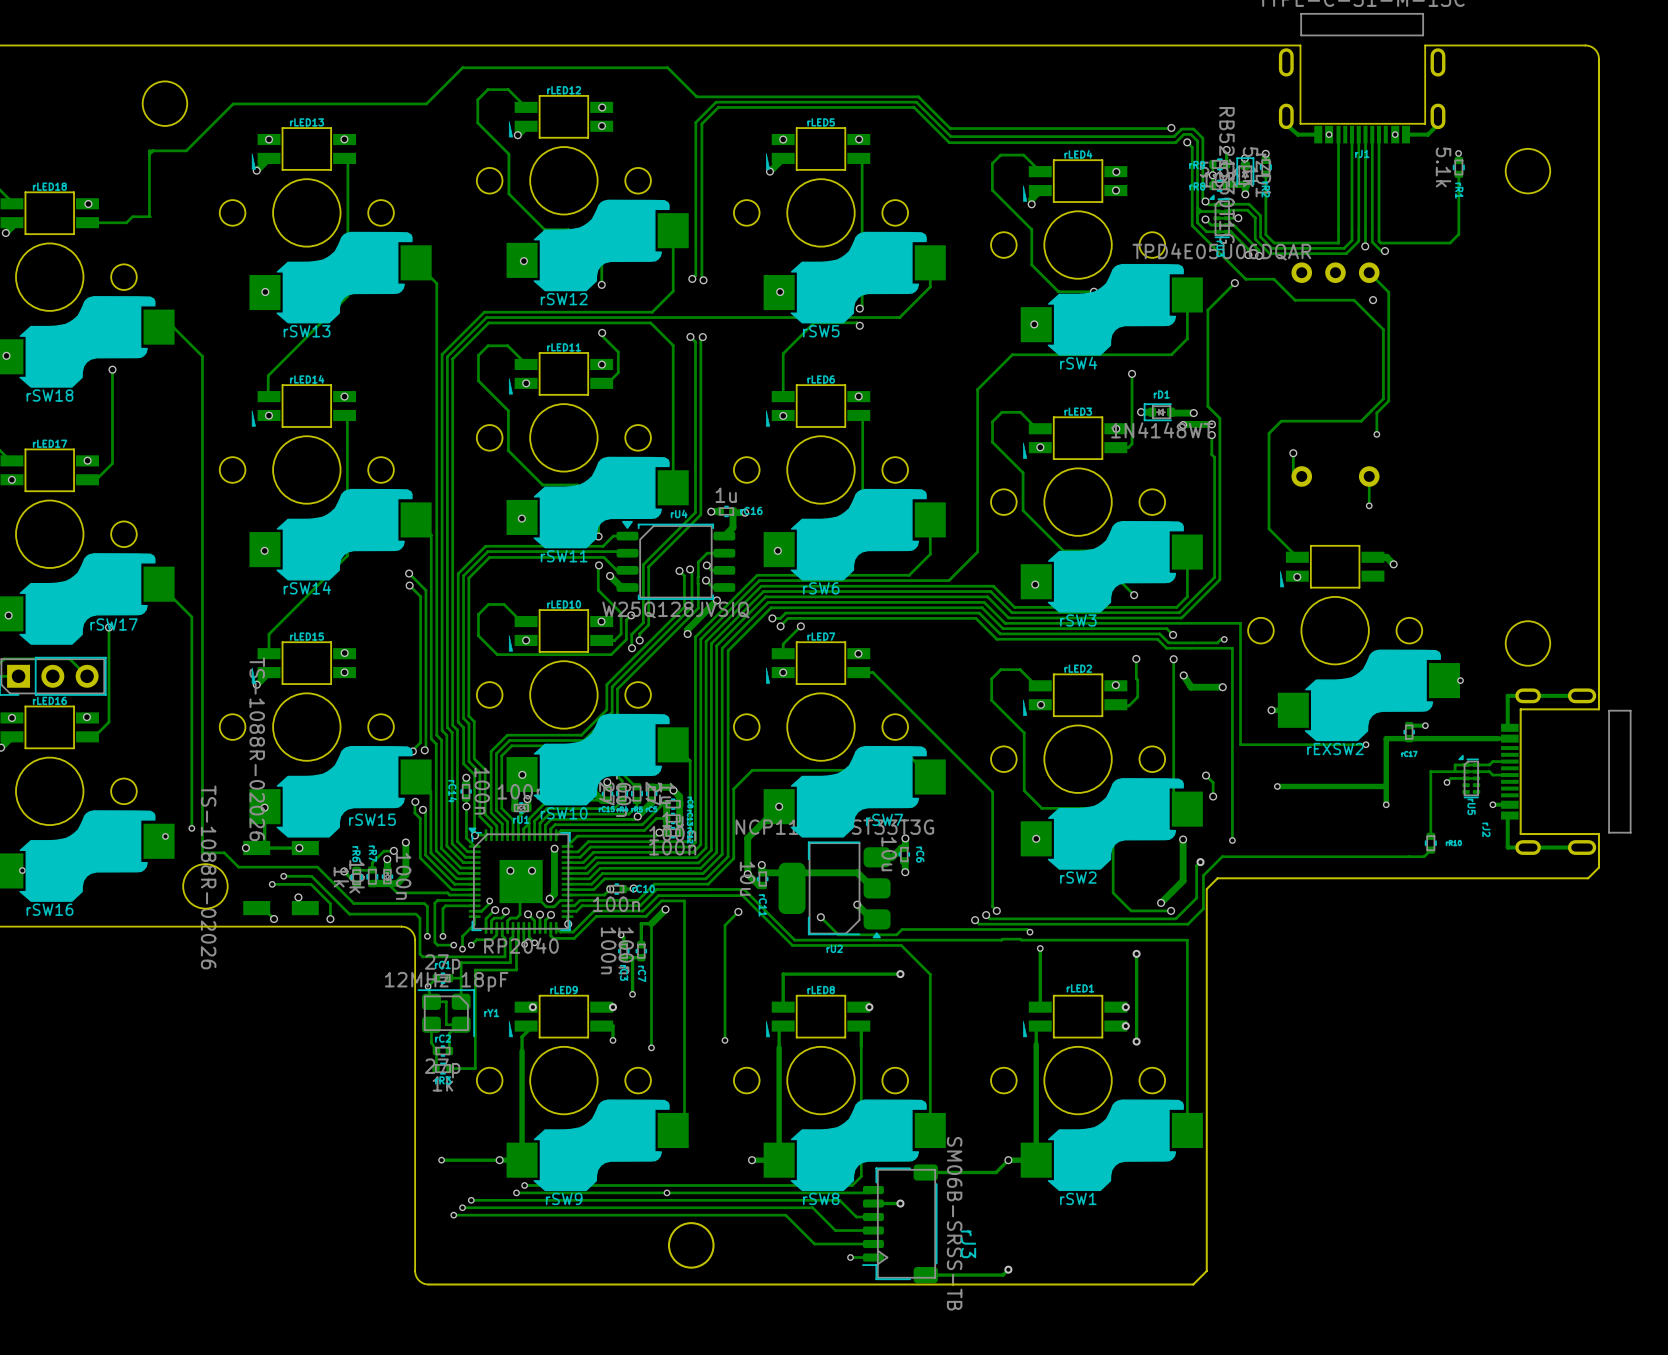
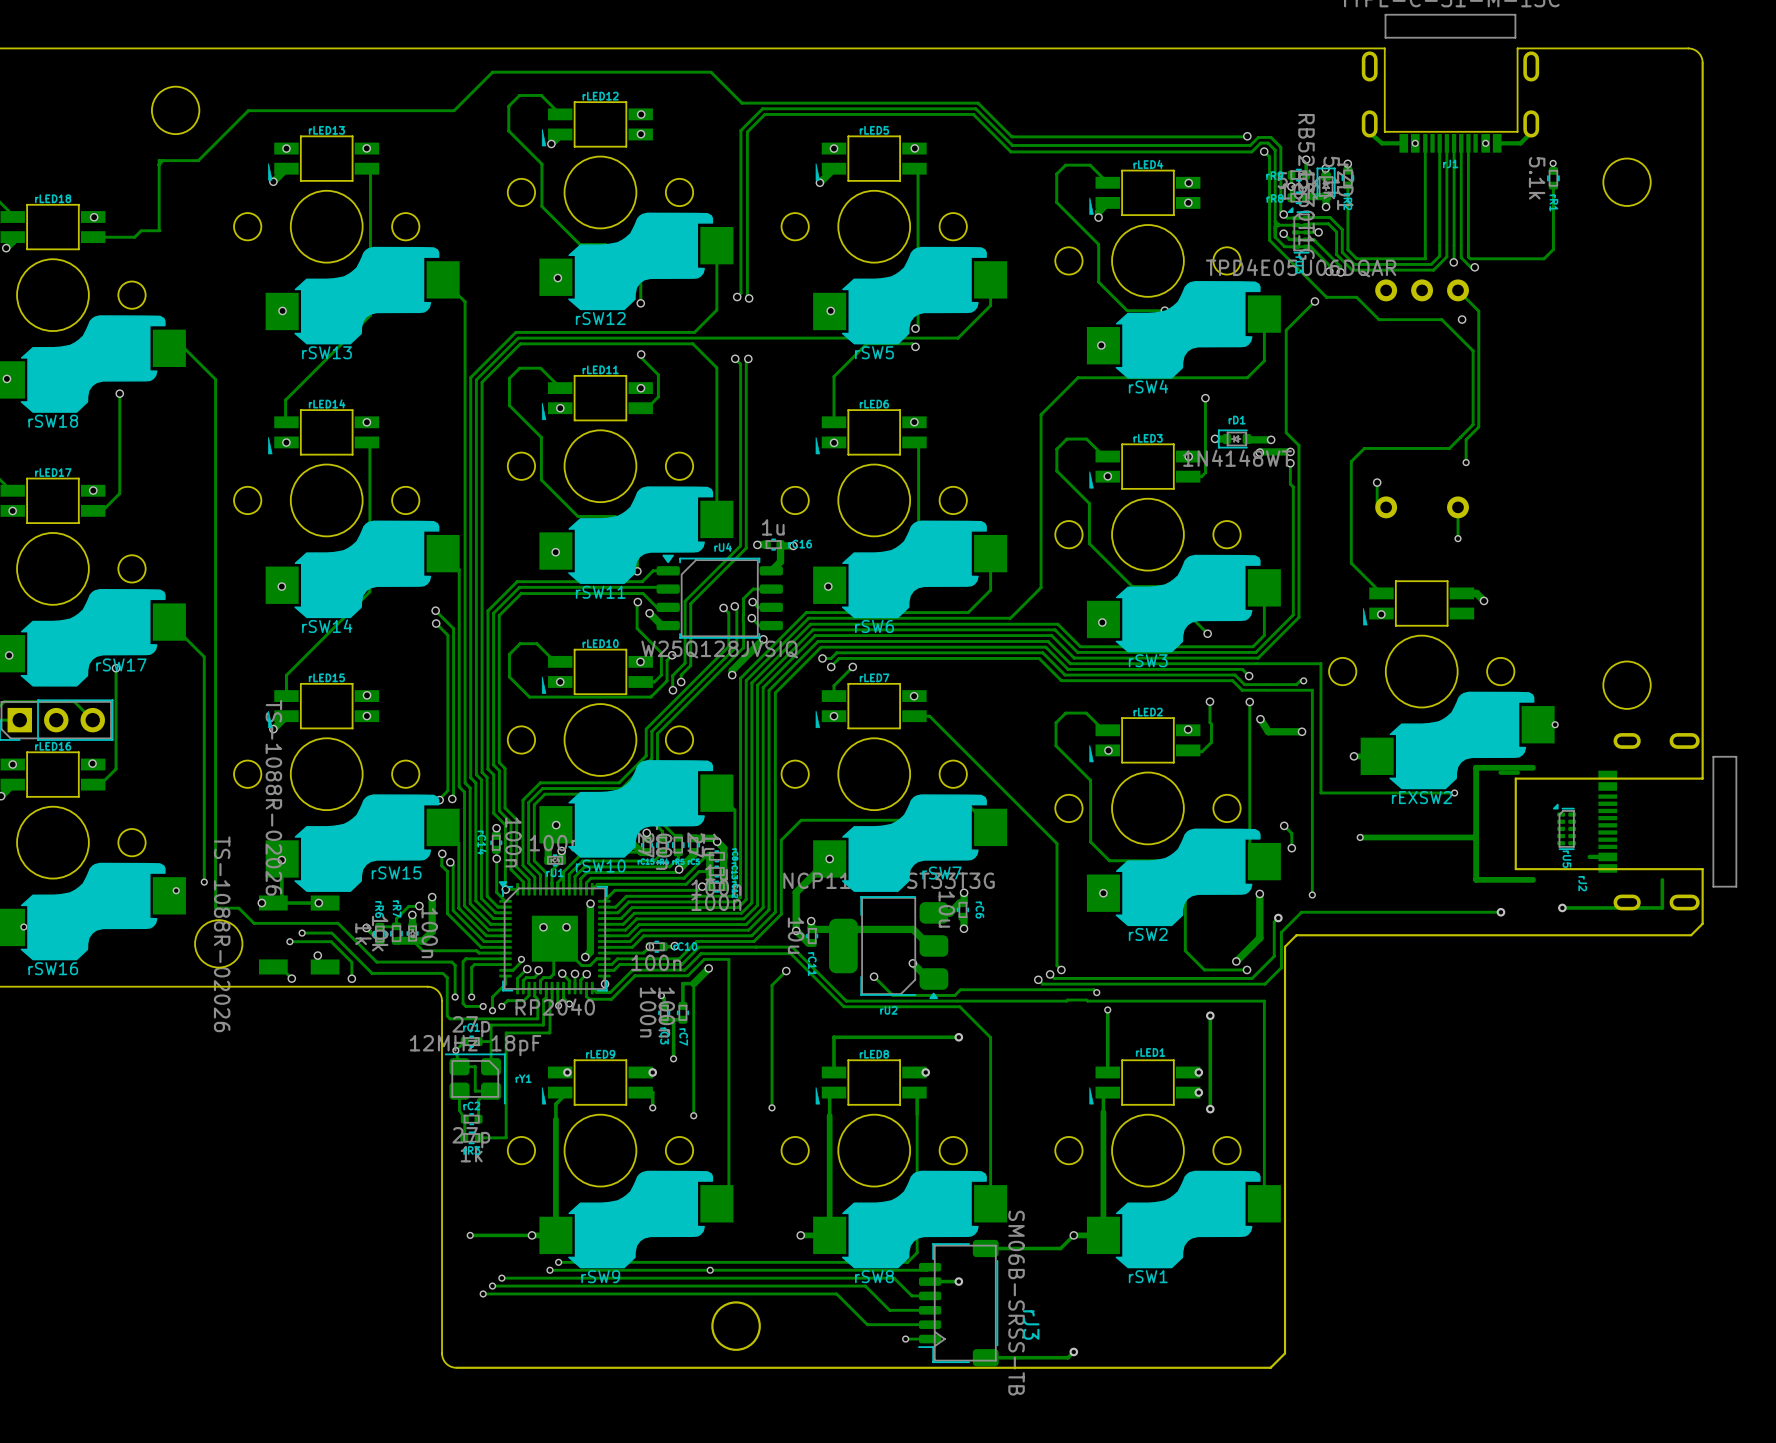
track: (1582, 695) (1507, 695) (1507, 725) (1509, 727) -> none
board edge: (1598, 709) (1520, 709) (1520, 834) (1598, 834) -> (1702, 755) (1702, 778) (1515, 778) (1515, 869) (1702, 869) (1702, 888)
via: (1425, 725) -> none
part: (1409, 732) -> none
track: (1509, 738) (1386, 738) -> (1533, 767) (1476, 767) (1476, 786)
track: (1509, 761) (1492, 761) (1489, 764) (1455, 764) (1455, 771) -> none
track: (1509, 775) (1492, 775) (1489, 771) (1430, 771) (1430, 836) -> none
track: (1476, 778) (1451, 778) (1446, 782) -> none
via: (1446, 782) -> none
track: none -> (1476, 856) (1476, 879) (1533, 879)
via: (1386, 804) -> none
via: (1492, 804) -> none
track: (1509, 815) (1507, 817) (1507, 847) (1582, 847) -> none
track: none -> (1662, 879) (1662, 907) (1562, 907)
part: (1430, 843) -> none
track: (1430, 850) (1424, 856) (1409, 856) -> none
via: none -> (1562, 907)
via: none -> (1500, 912)

